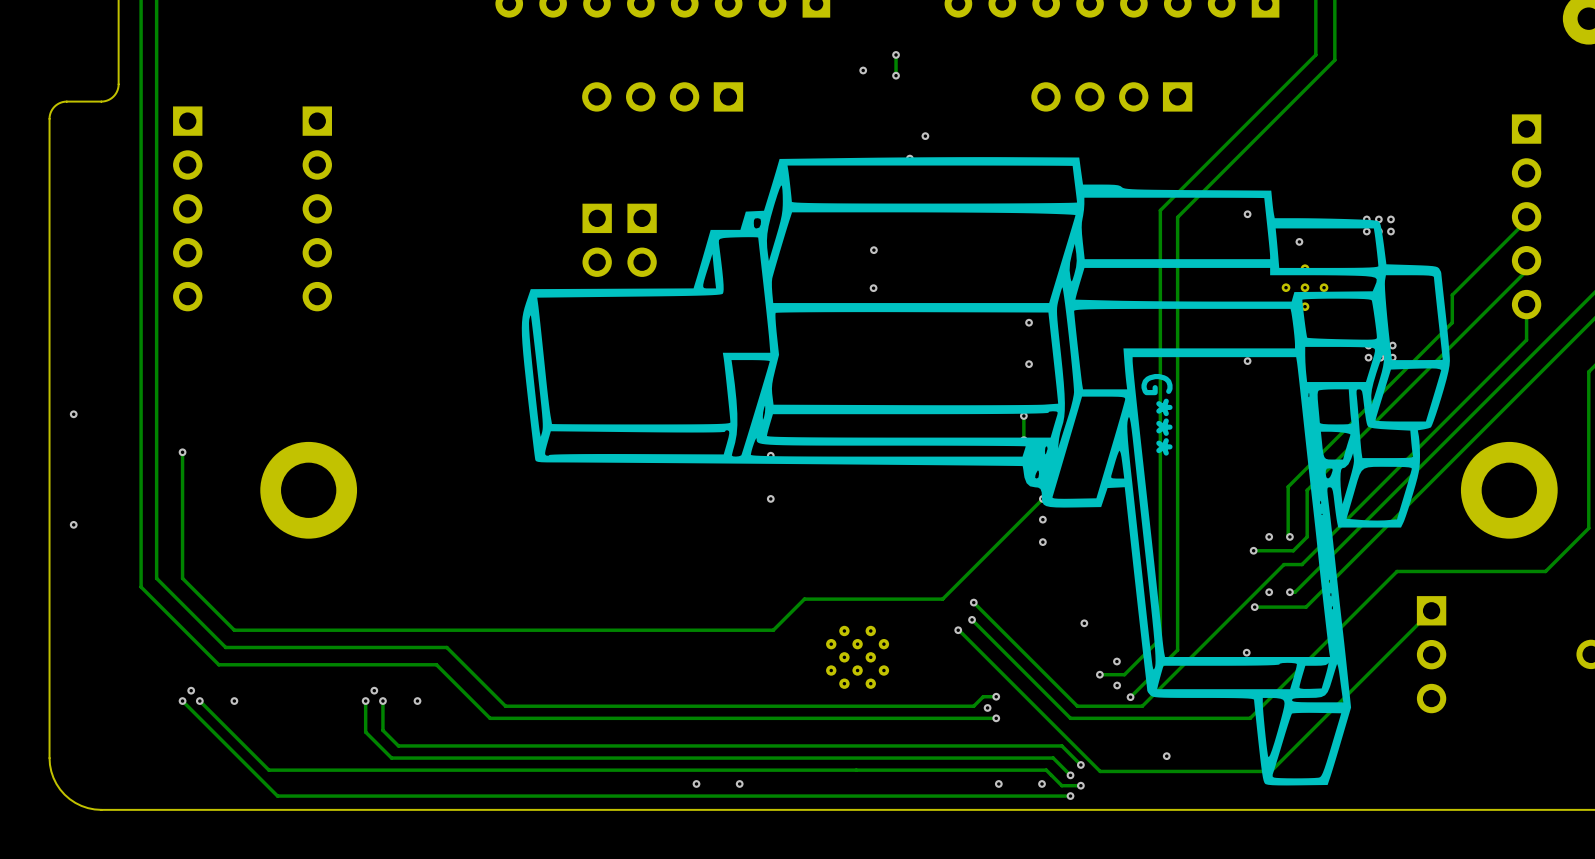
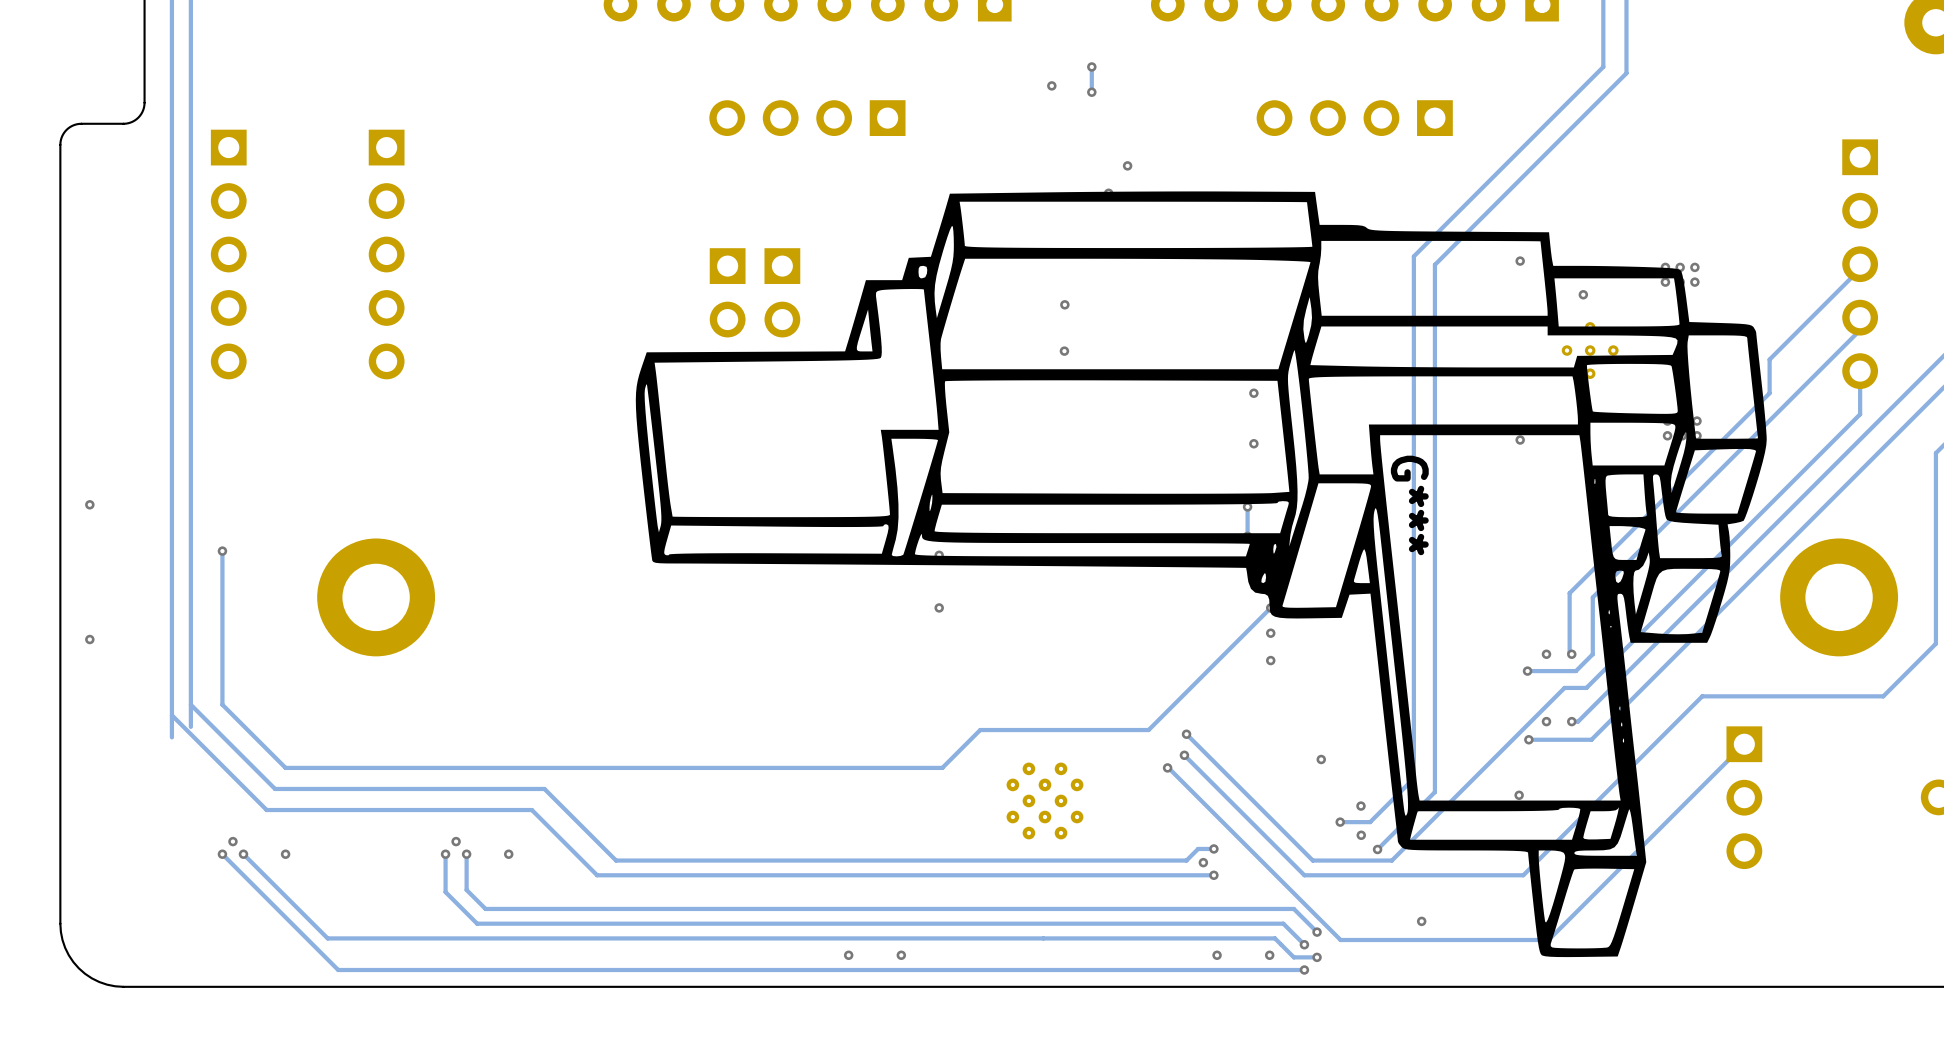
track: none -> (190, 704) (190, 726)
track: none -> (171, 715) (171, 737)

